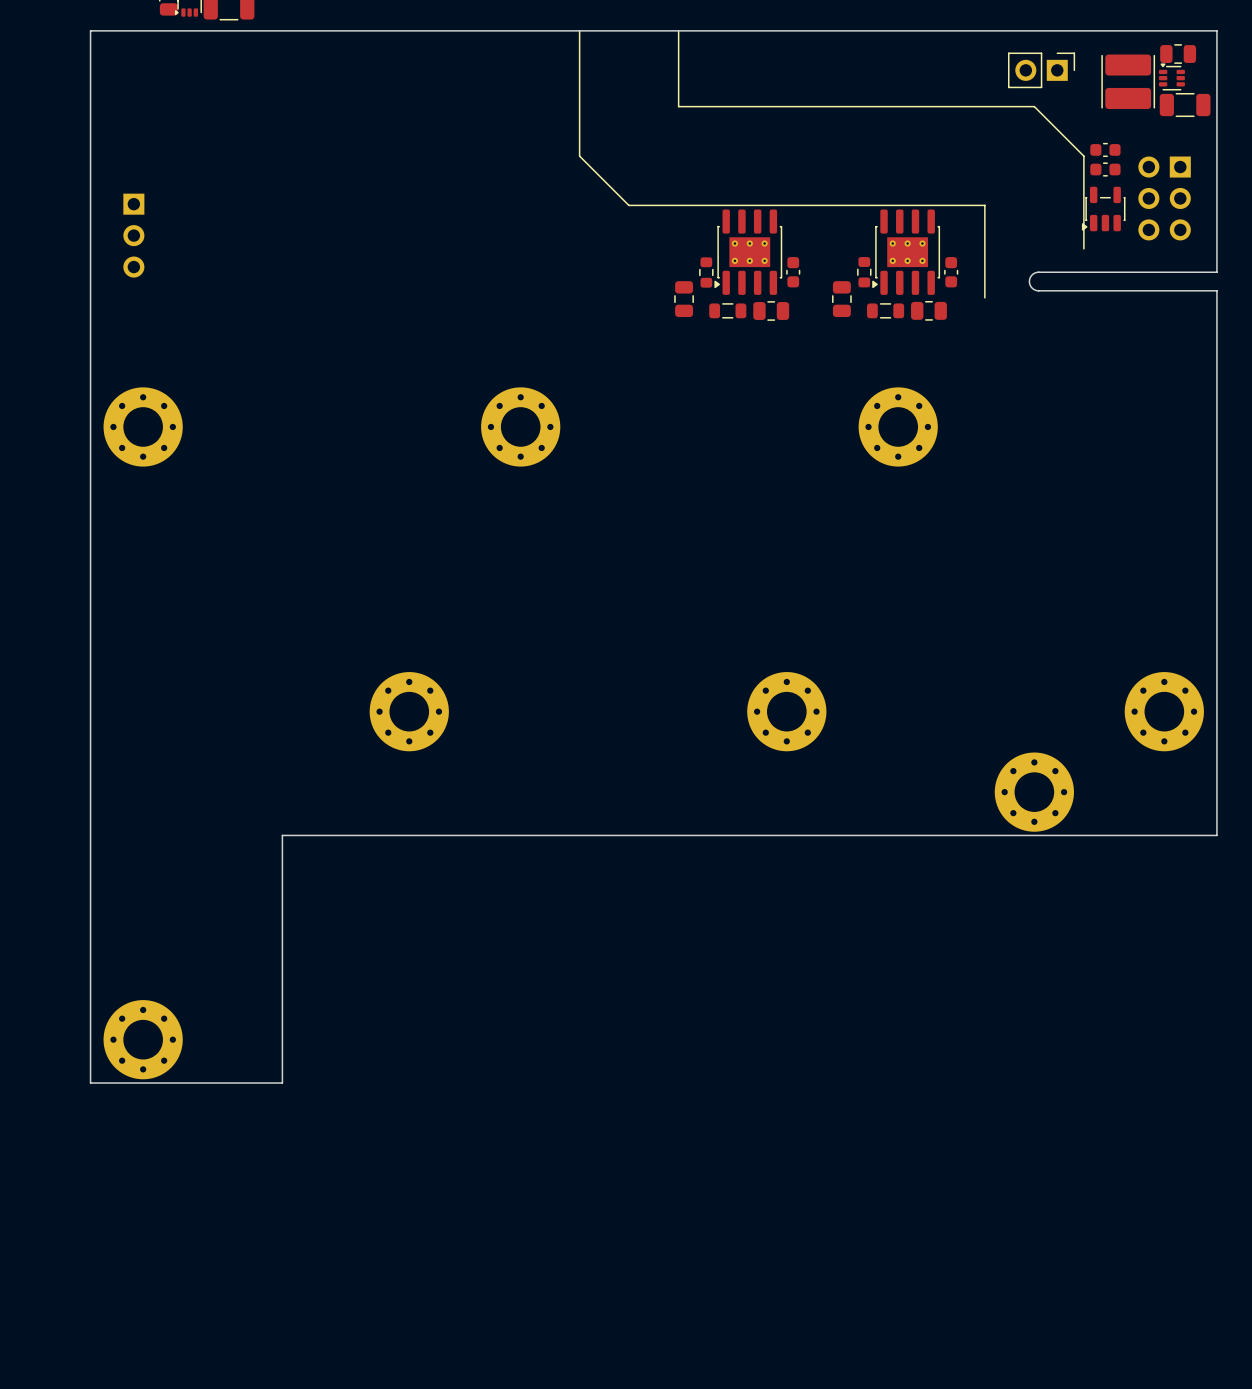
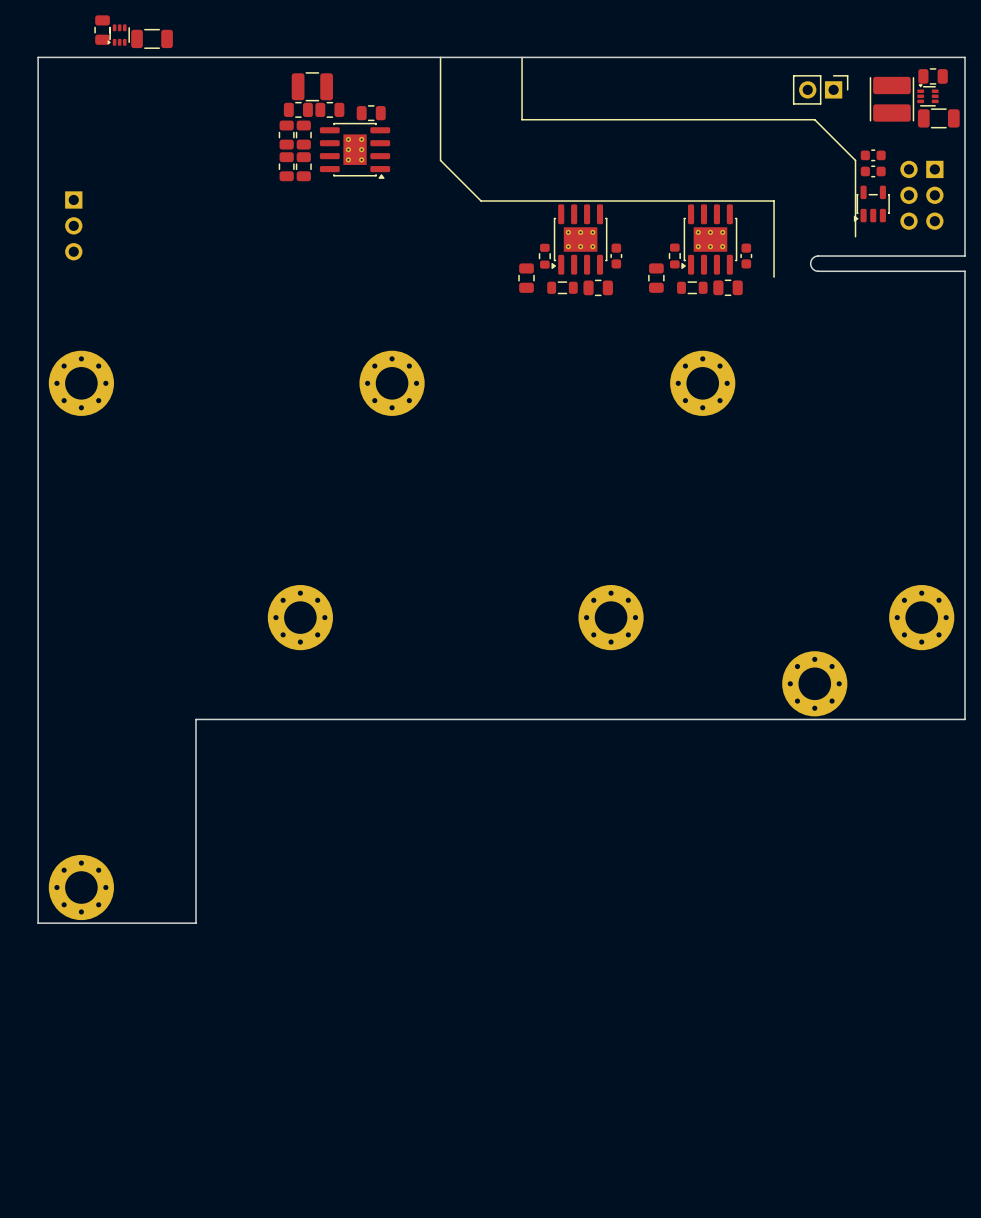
part: none -> (312, 86)
part: none -> (298, 109)
part: none -> (329, 109)
part: none -> (371, 113)
part: none -> (286, 135)
part: none -> (303, 135)
part: none -> (355, 150)
part: none -> (286, 166)
part: none -> (303, 166)

